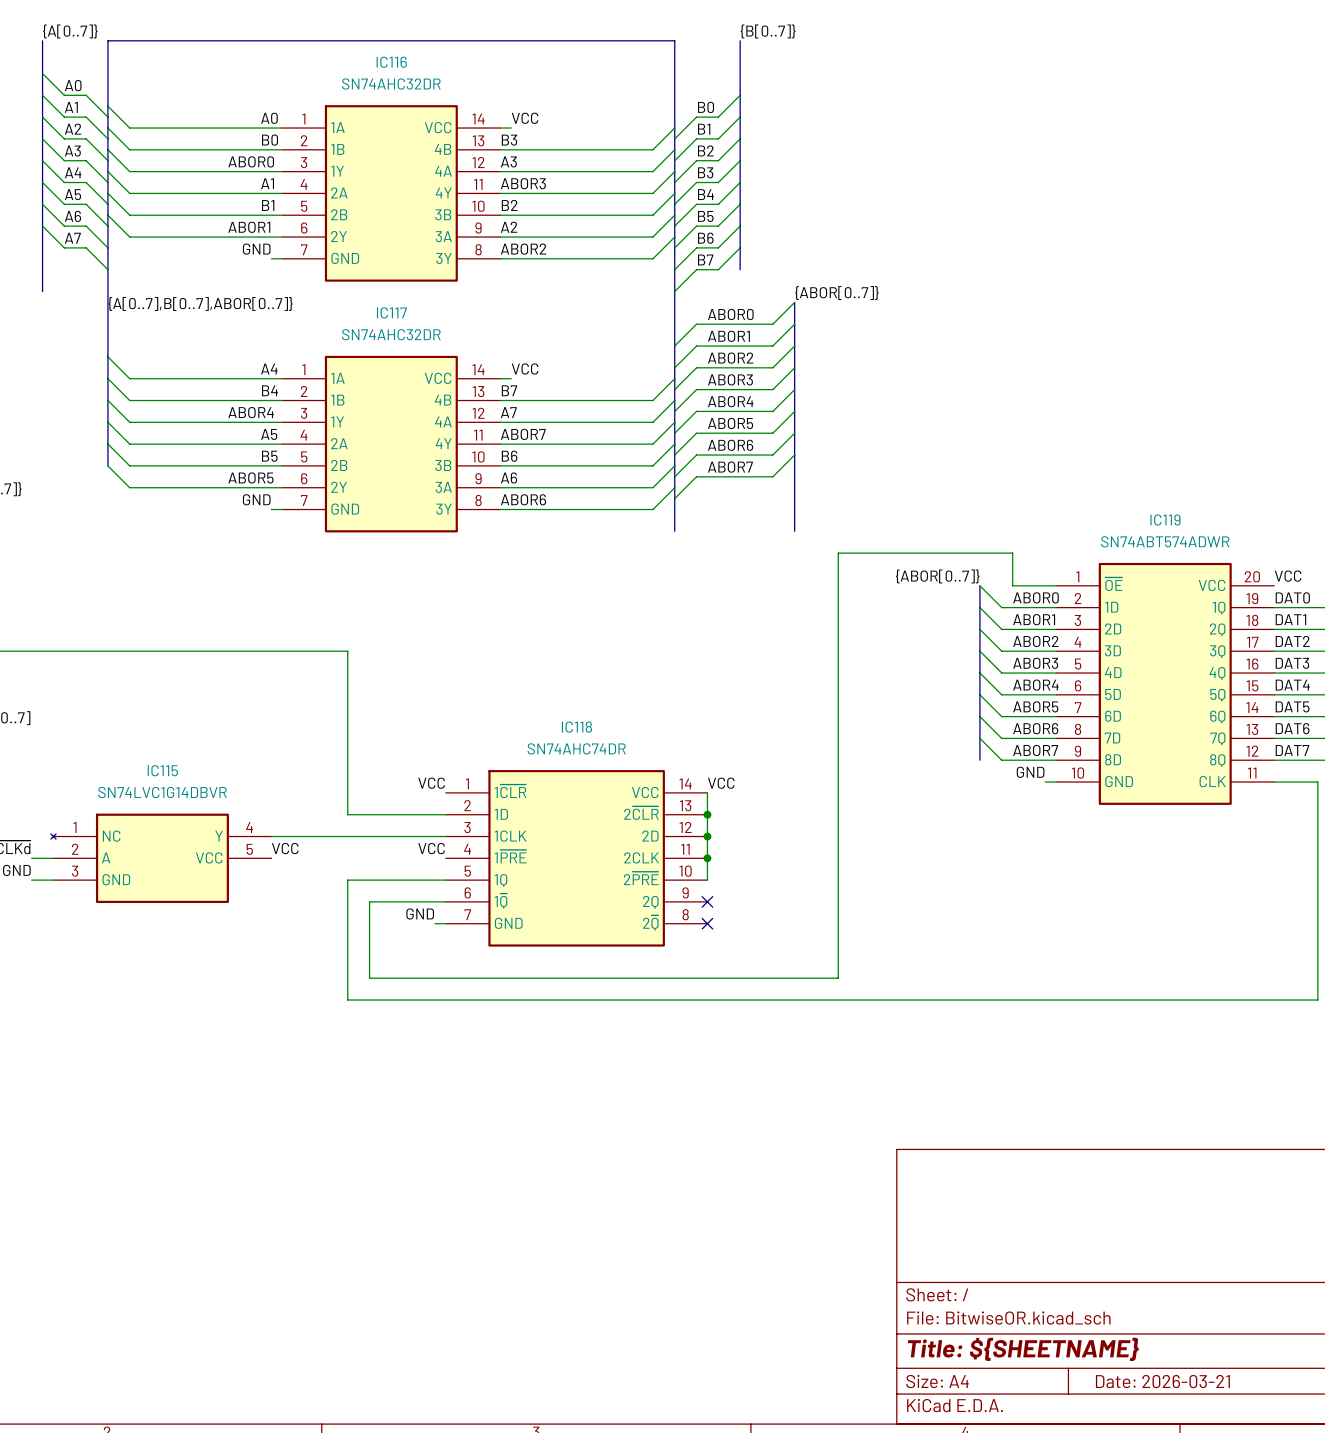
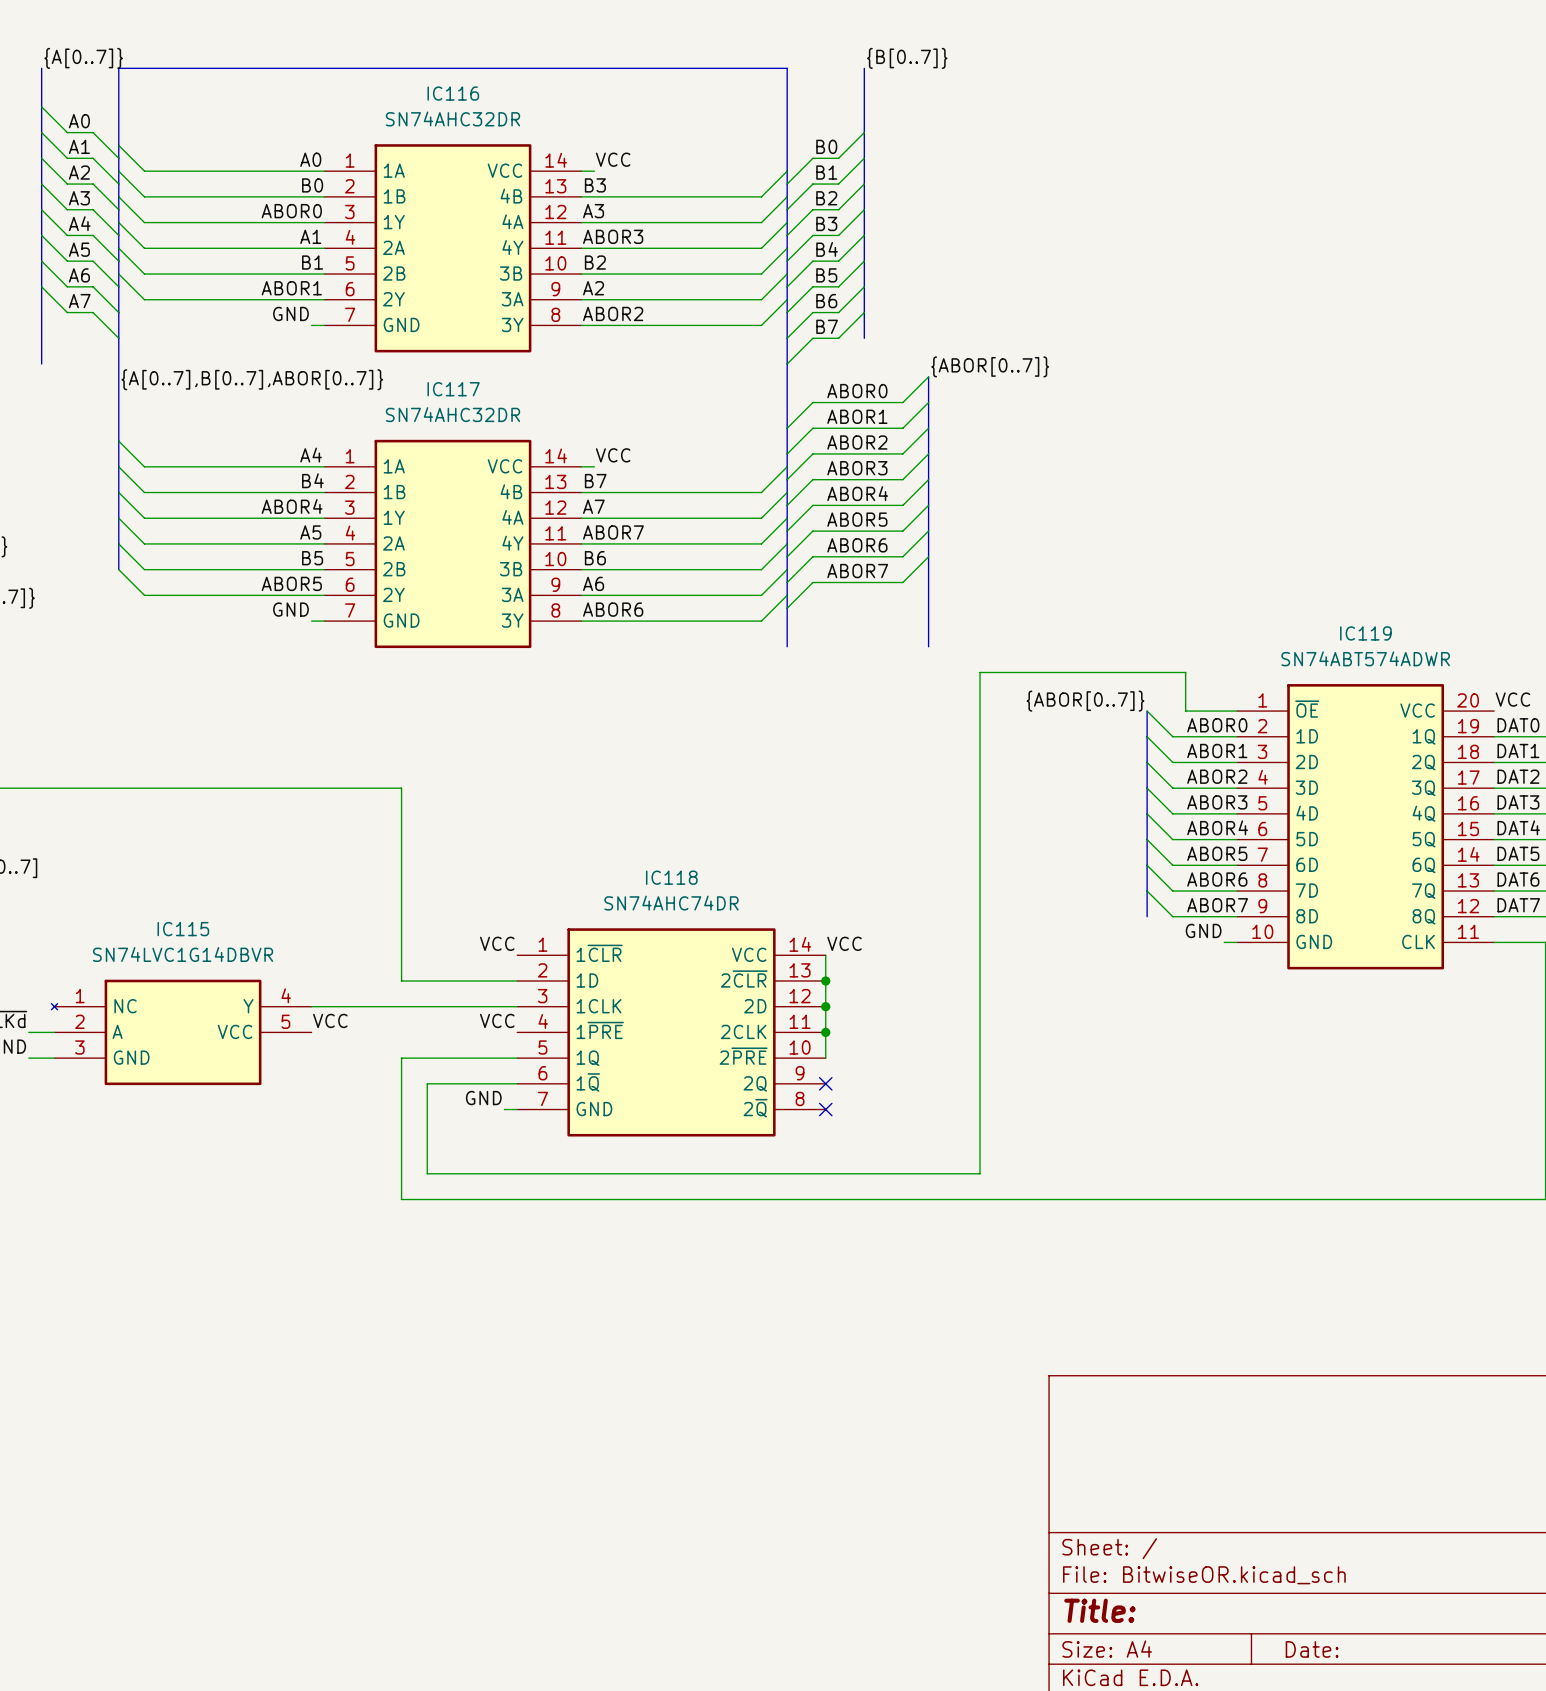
title block: Title: ${SHEETNAME} (1023, 1349) -> Title: (1099, 1610)
title block: Date: 2026-03-21 (1162, 1381) -> Date: (1312, 1649)

